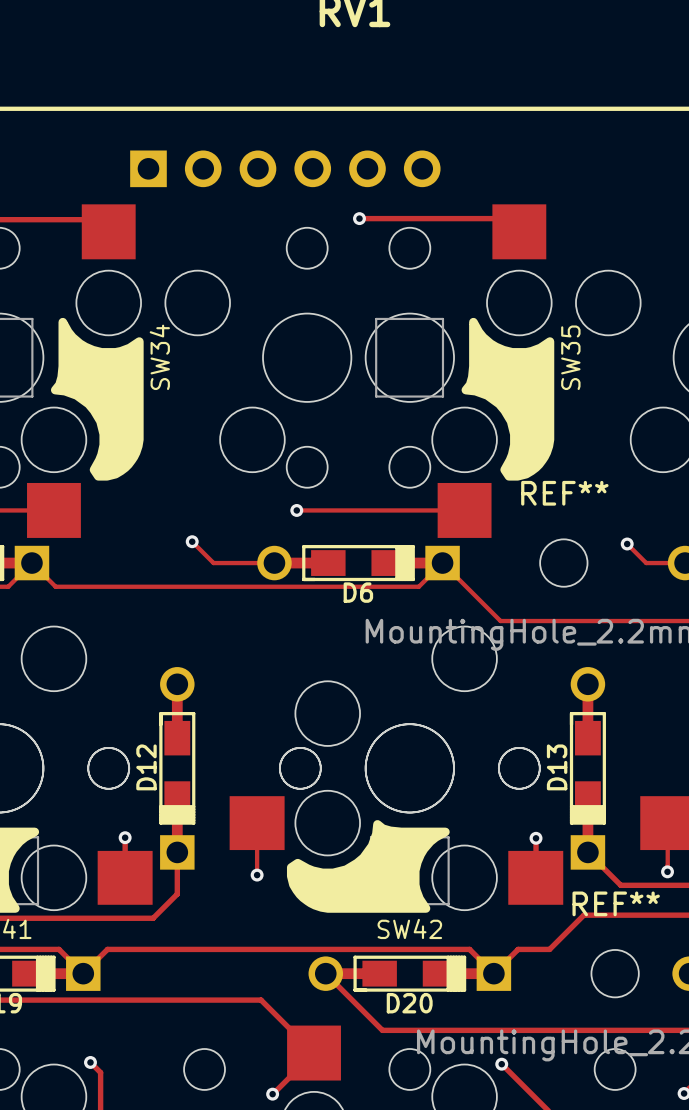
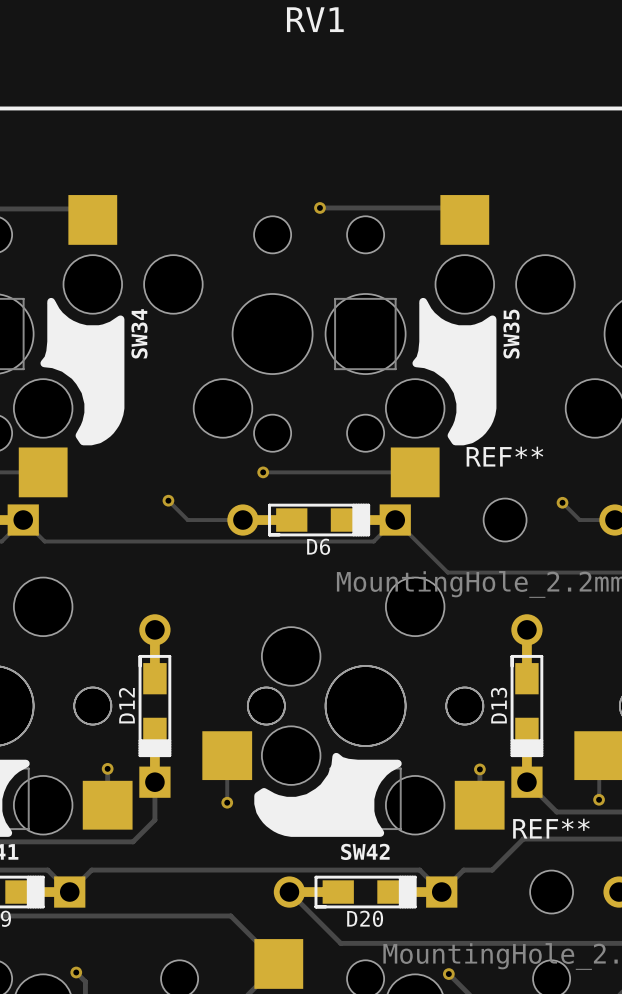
part: (285, 168) -> none

